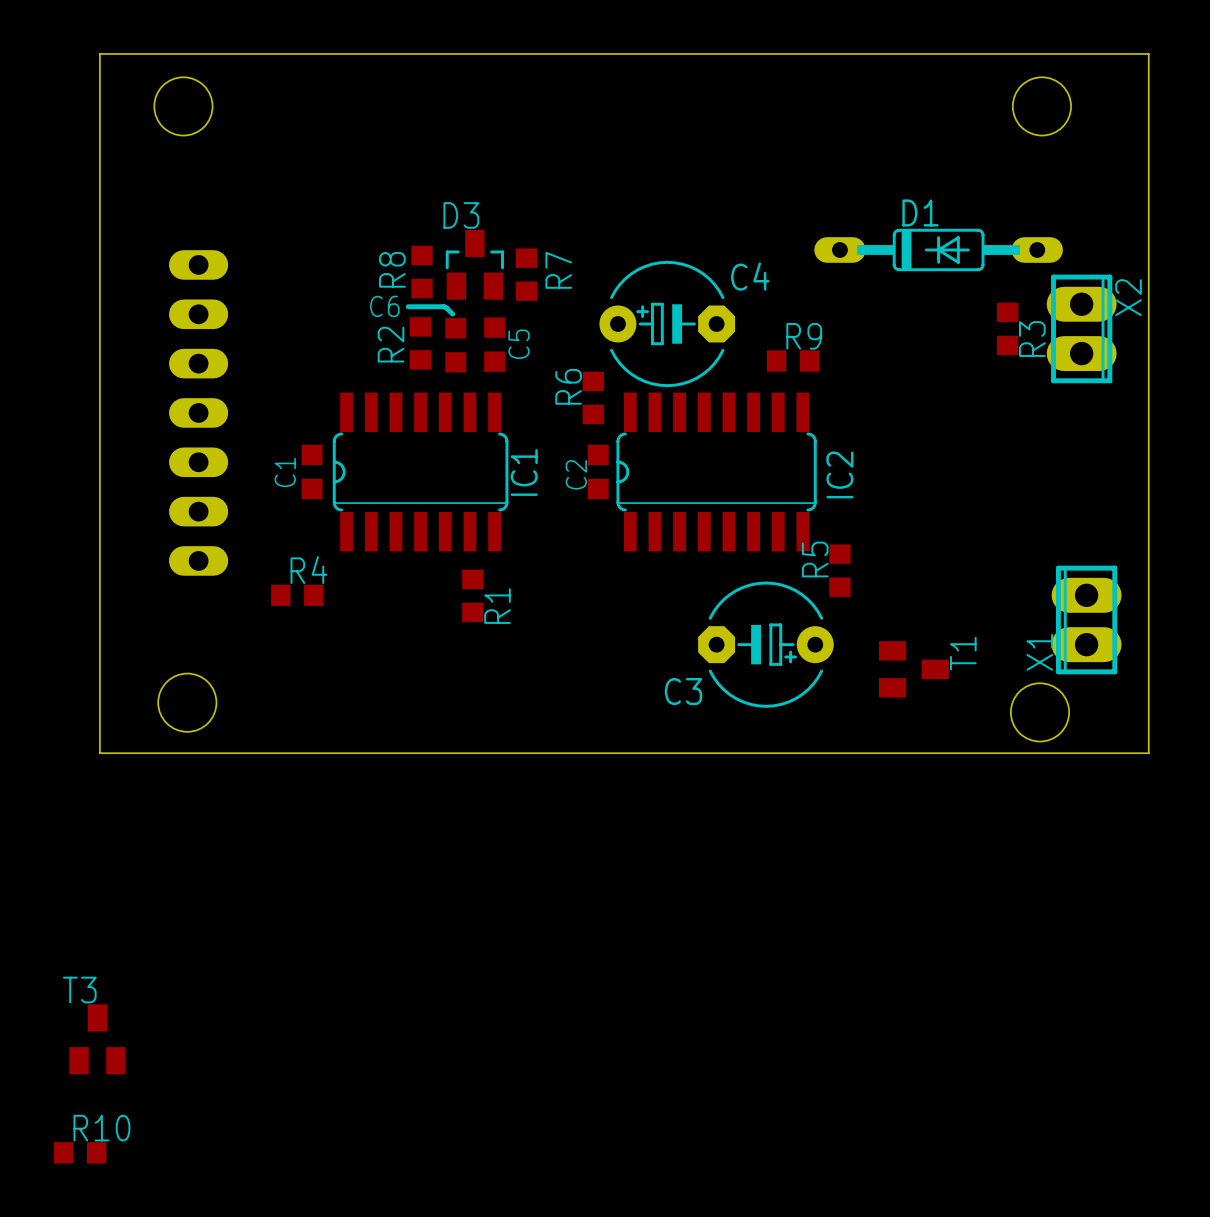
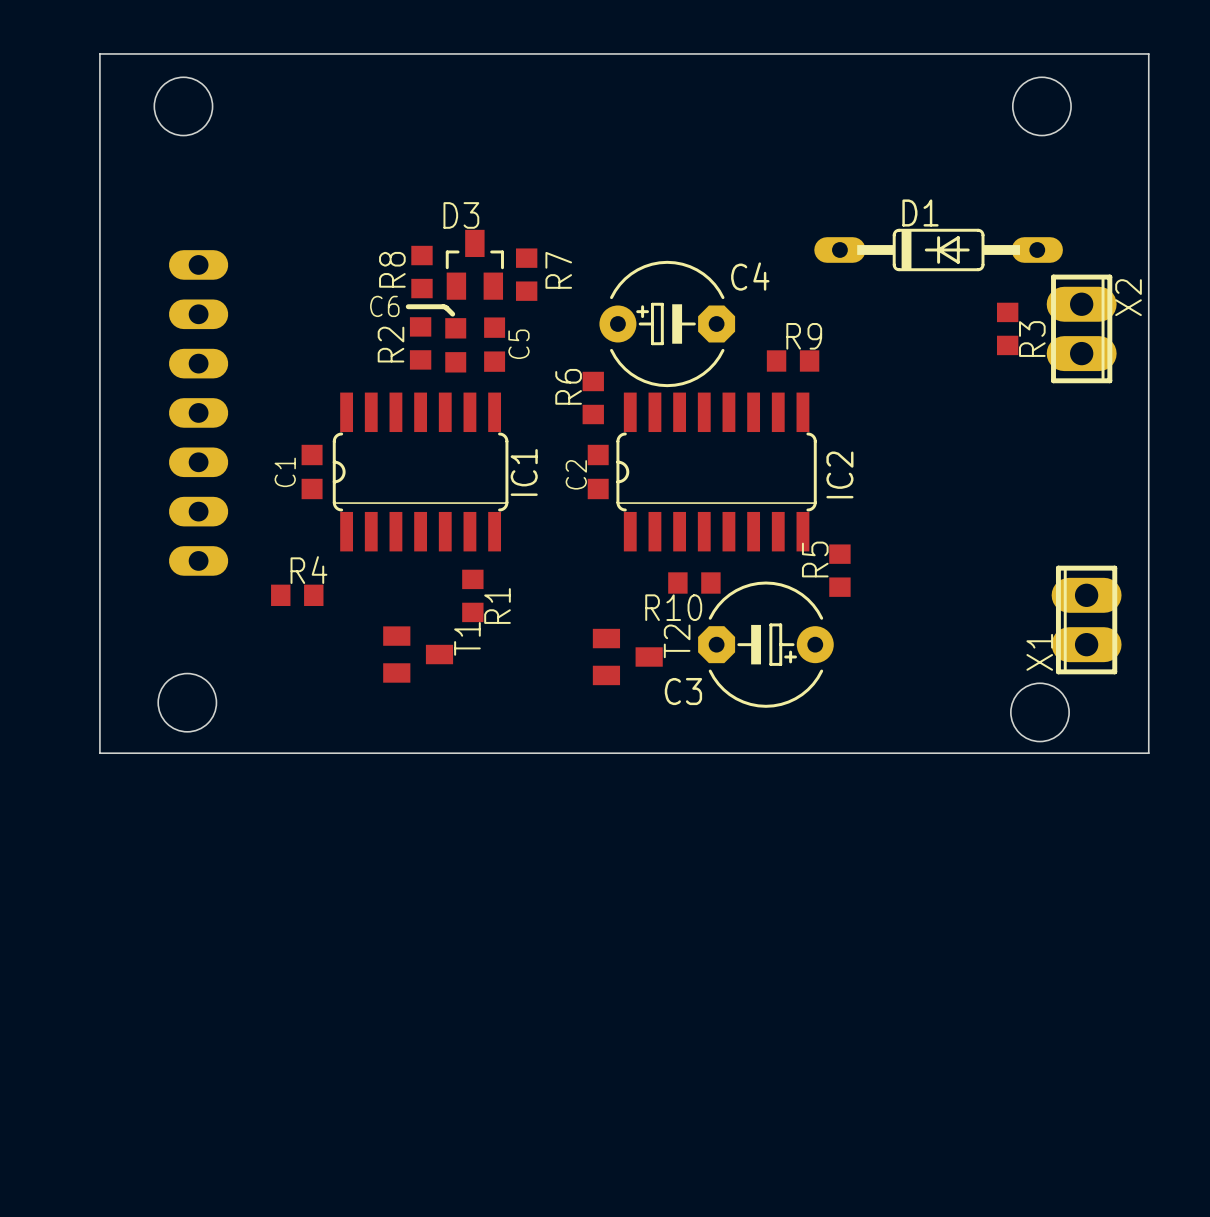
T2: none -> (627, 656)
T1 position: (913, 669) -> (418, 654)
T3: (97, 1039) -> none
R10 name position: R10 (101, 1128) -> R10 (673, 607)
R10 position: (80, 1152) -> (694, 582)

